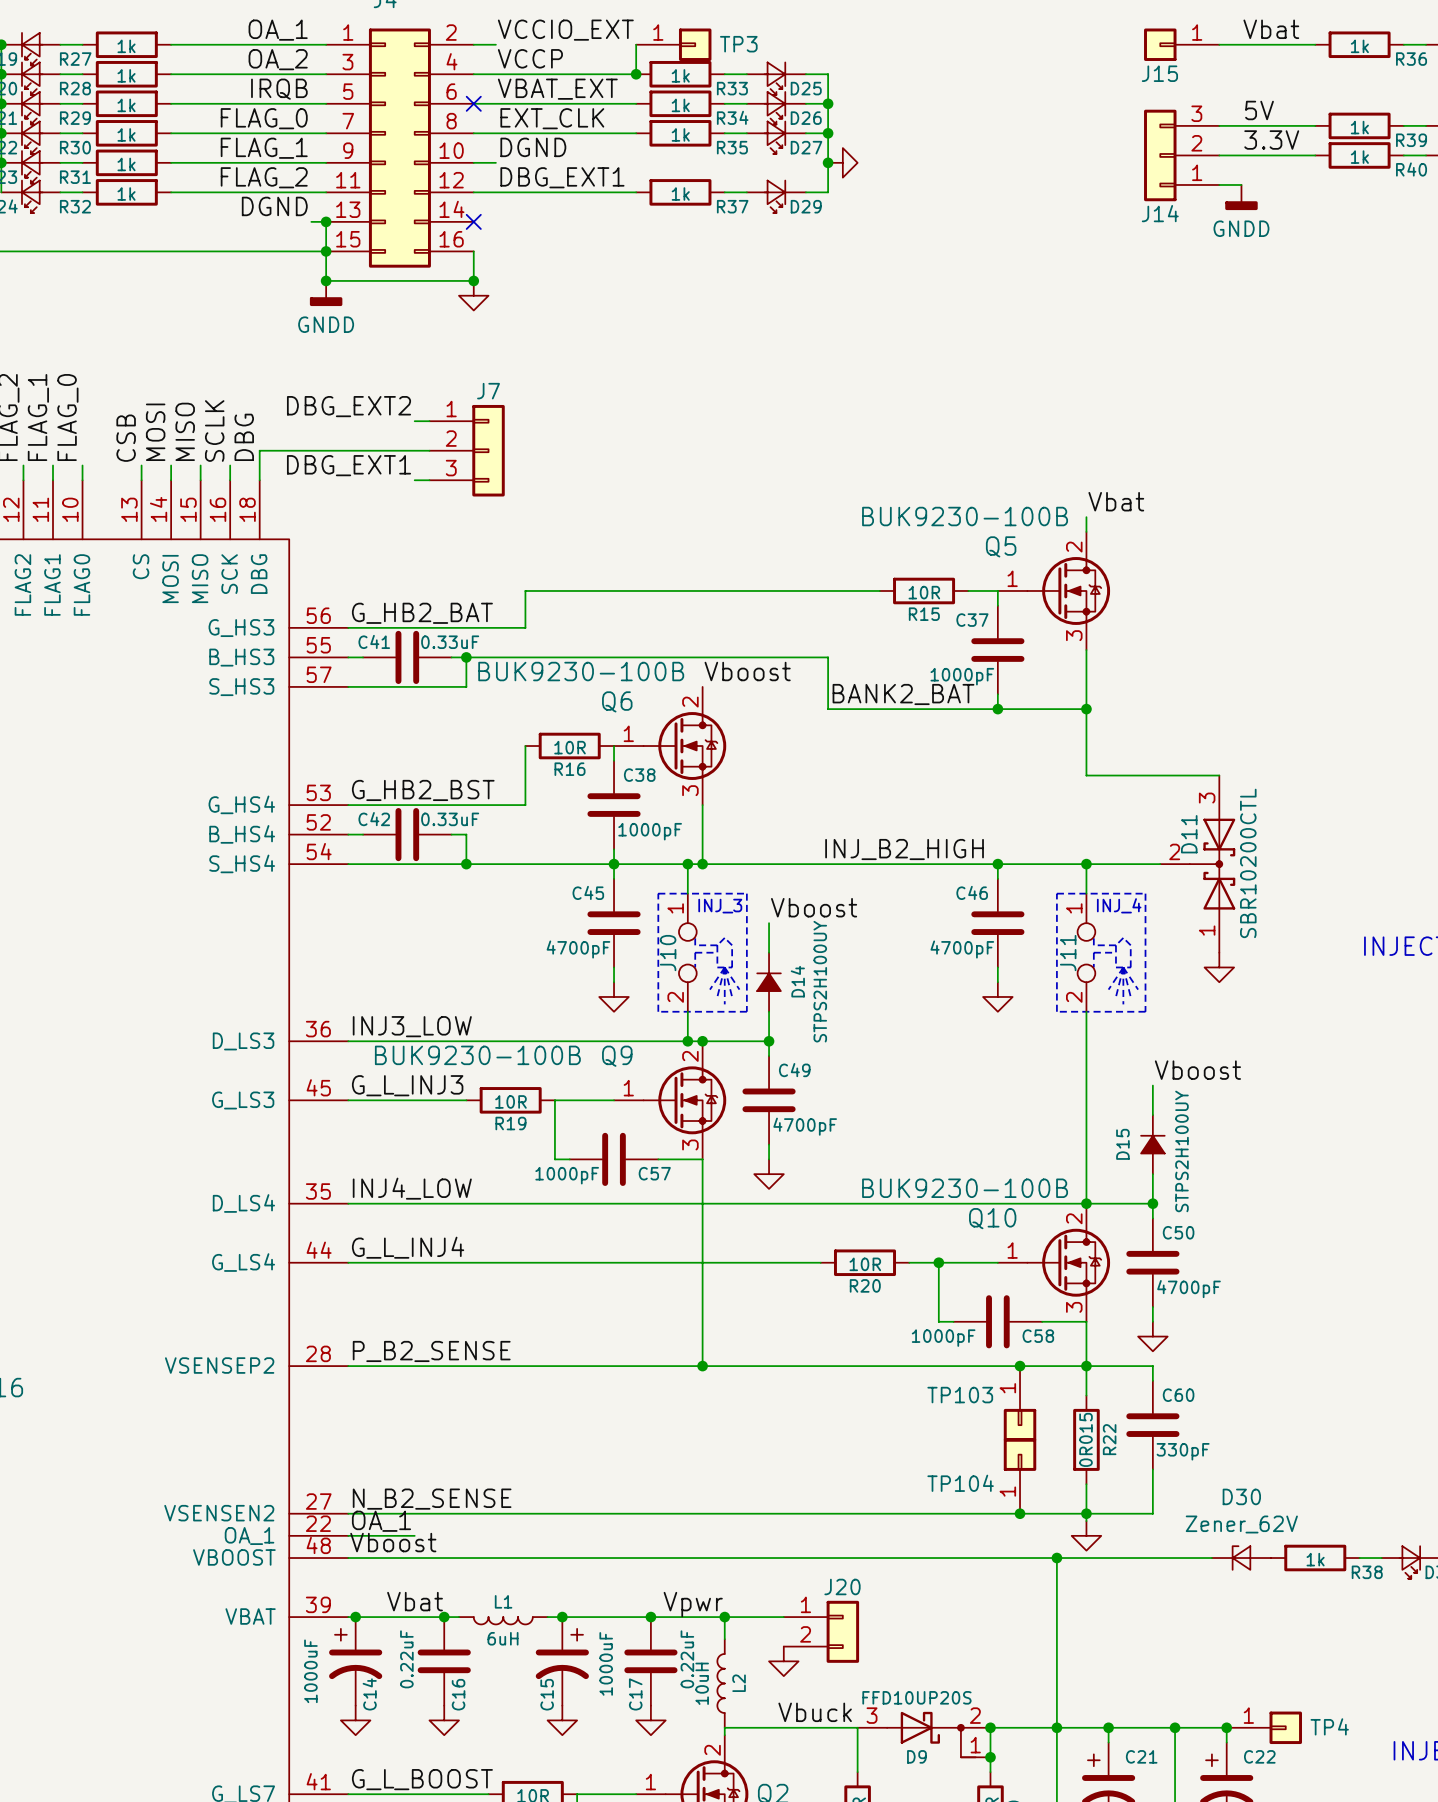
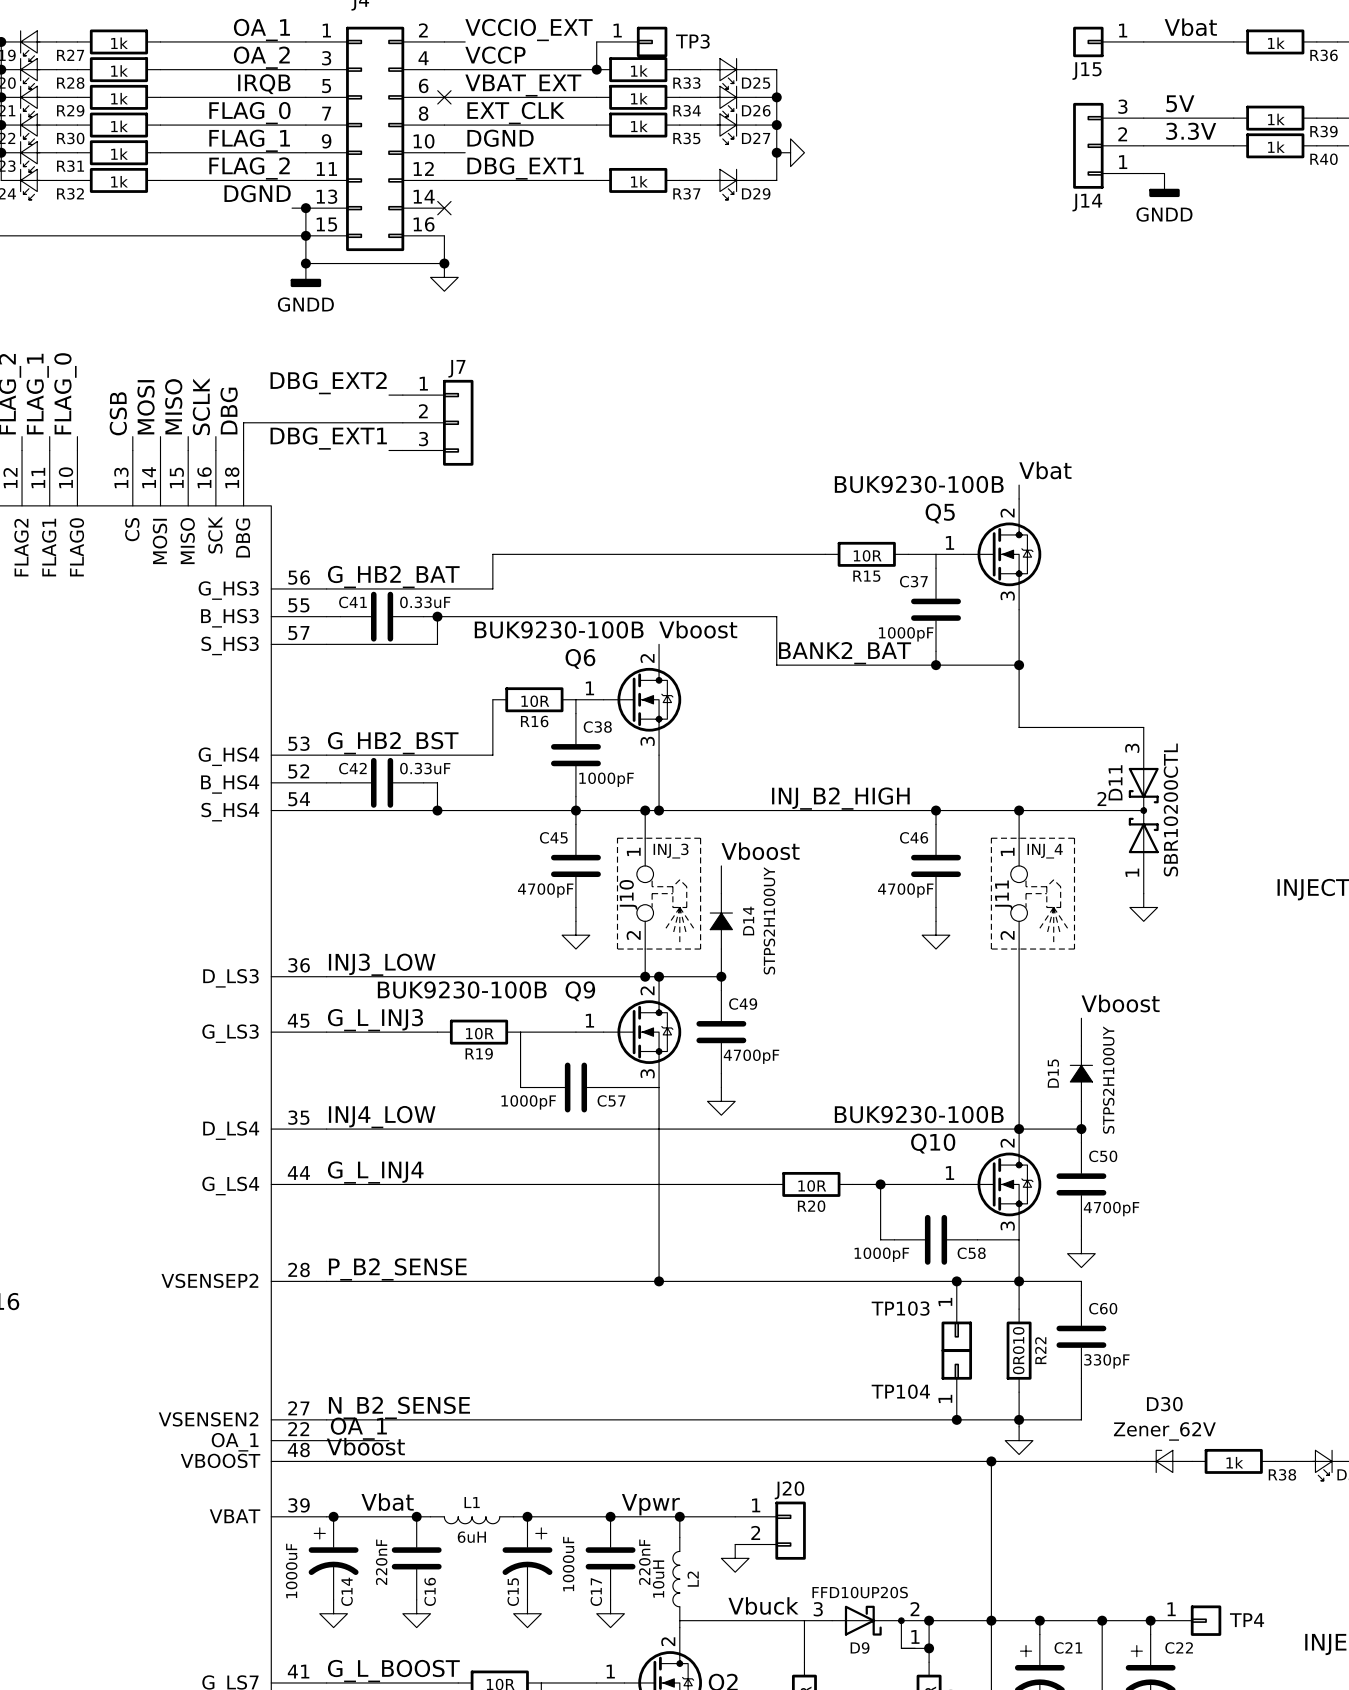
R22 value: 0R015 (1086, 1439) -> 0R010 (1018, 1350)
C16 value: 0.22uF (406, 1659) -> 220nF (381, 1562)
C17 value: 0.22uF (687, 1659) -> 220nF (644, 1562)

